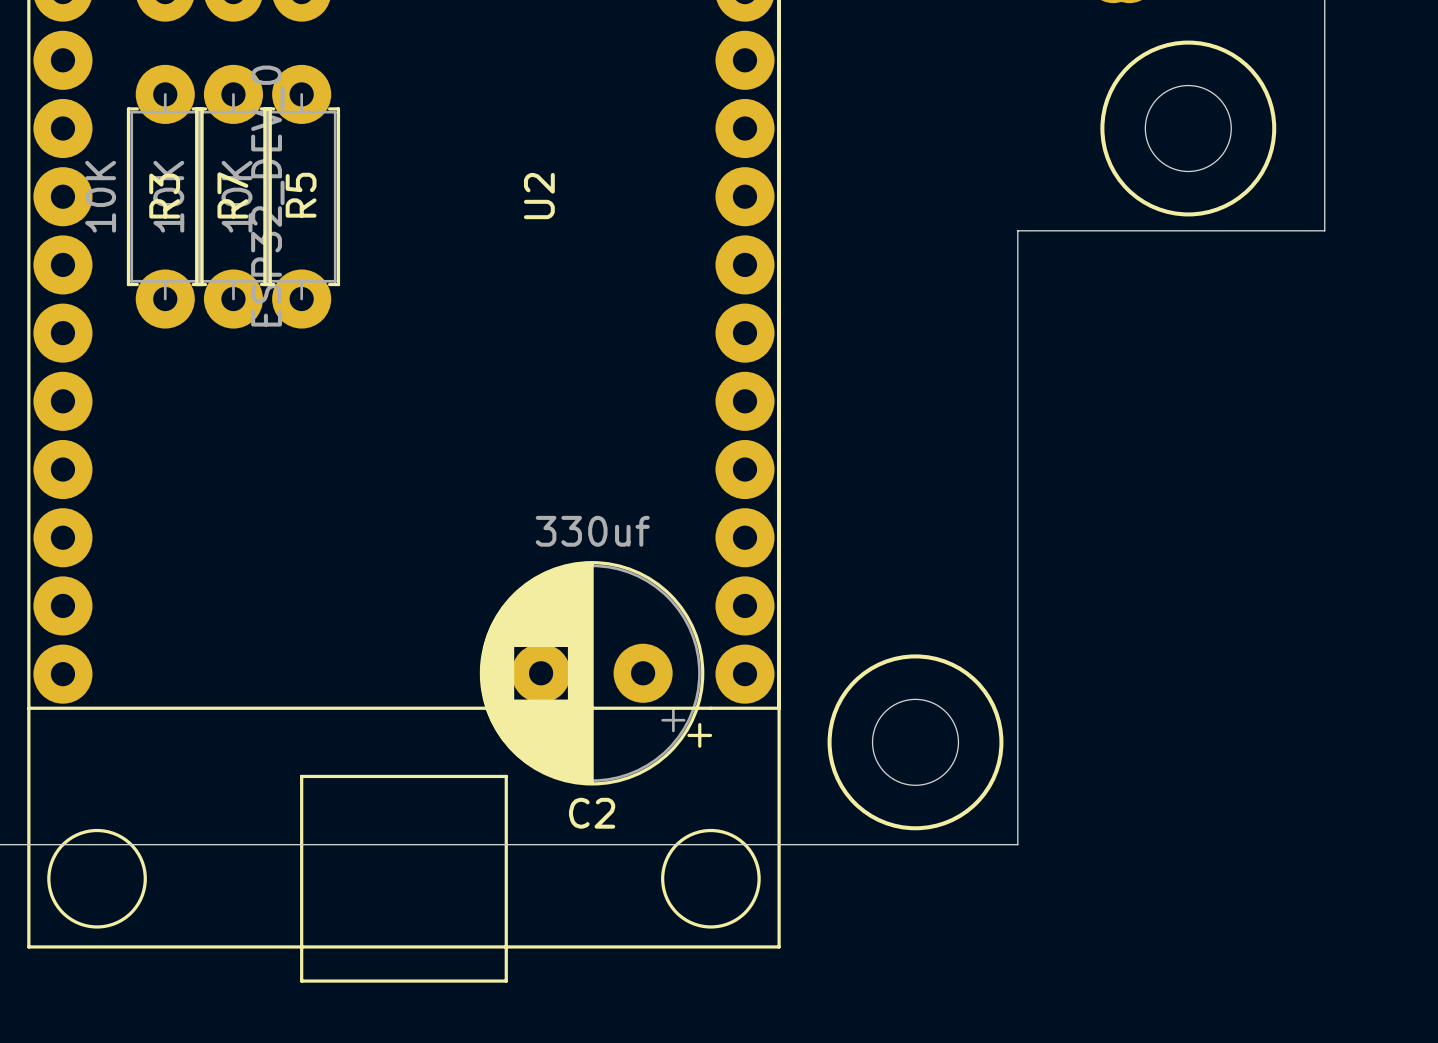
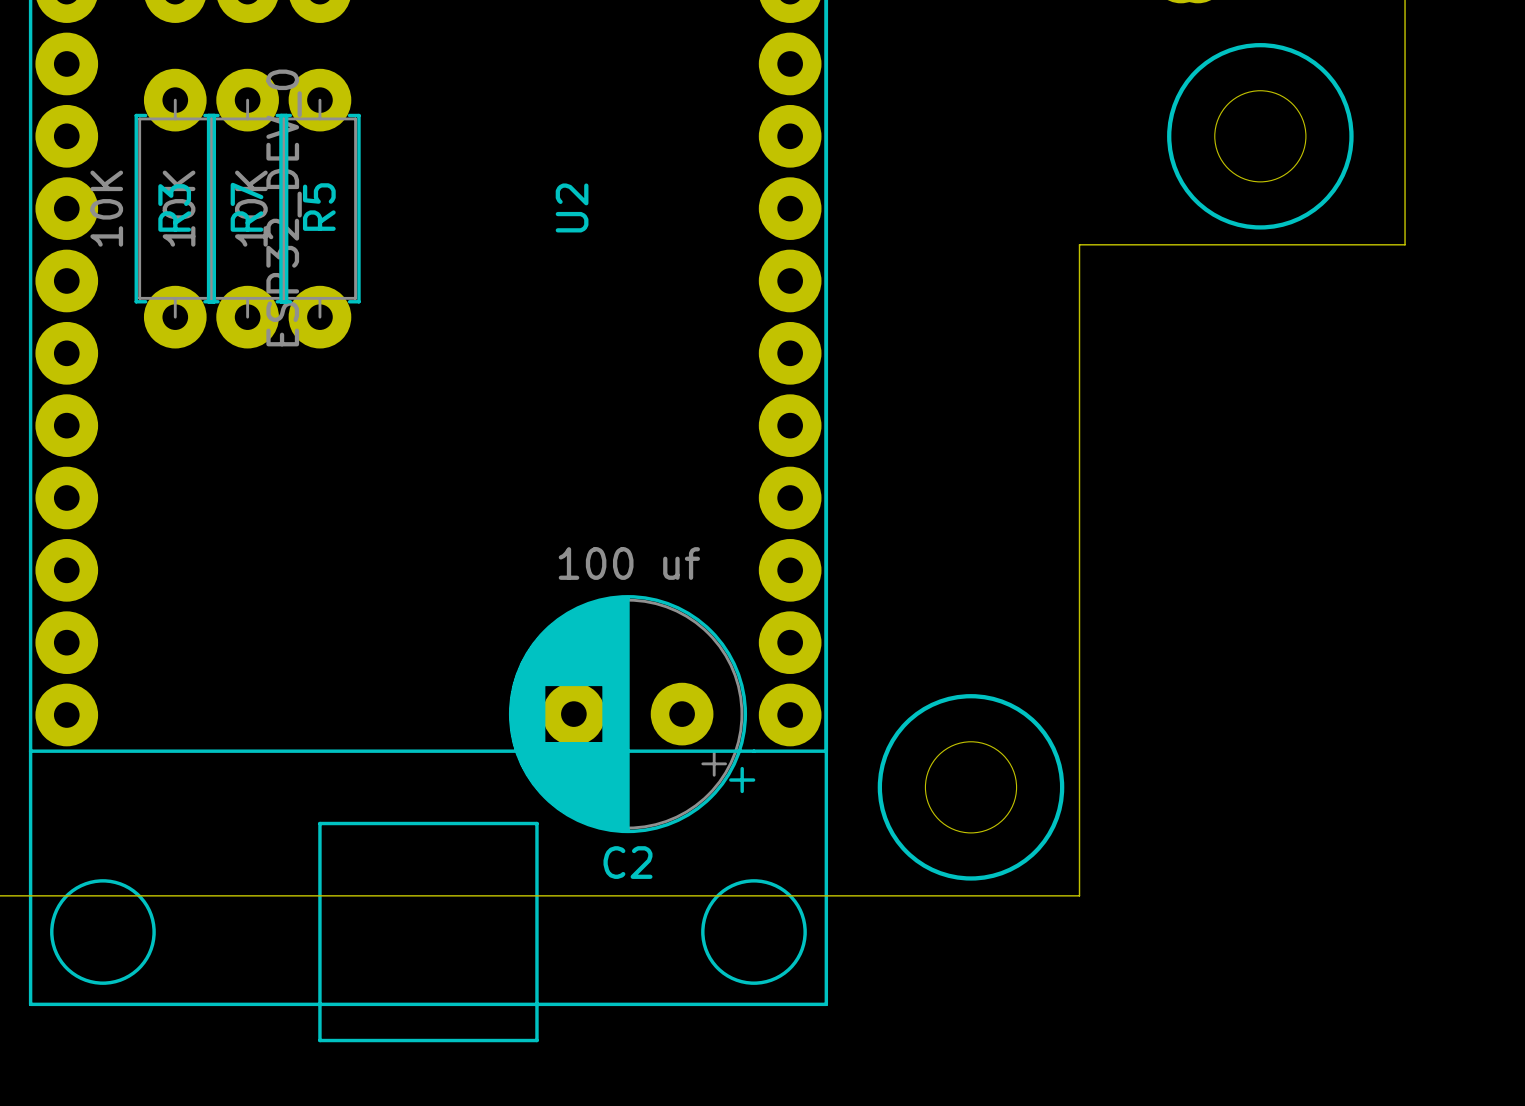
C2 value: 330uf (592, 531) -> 100 uf (629, 563)

